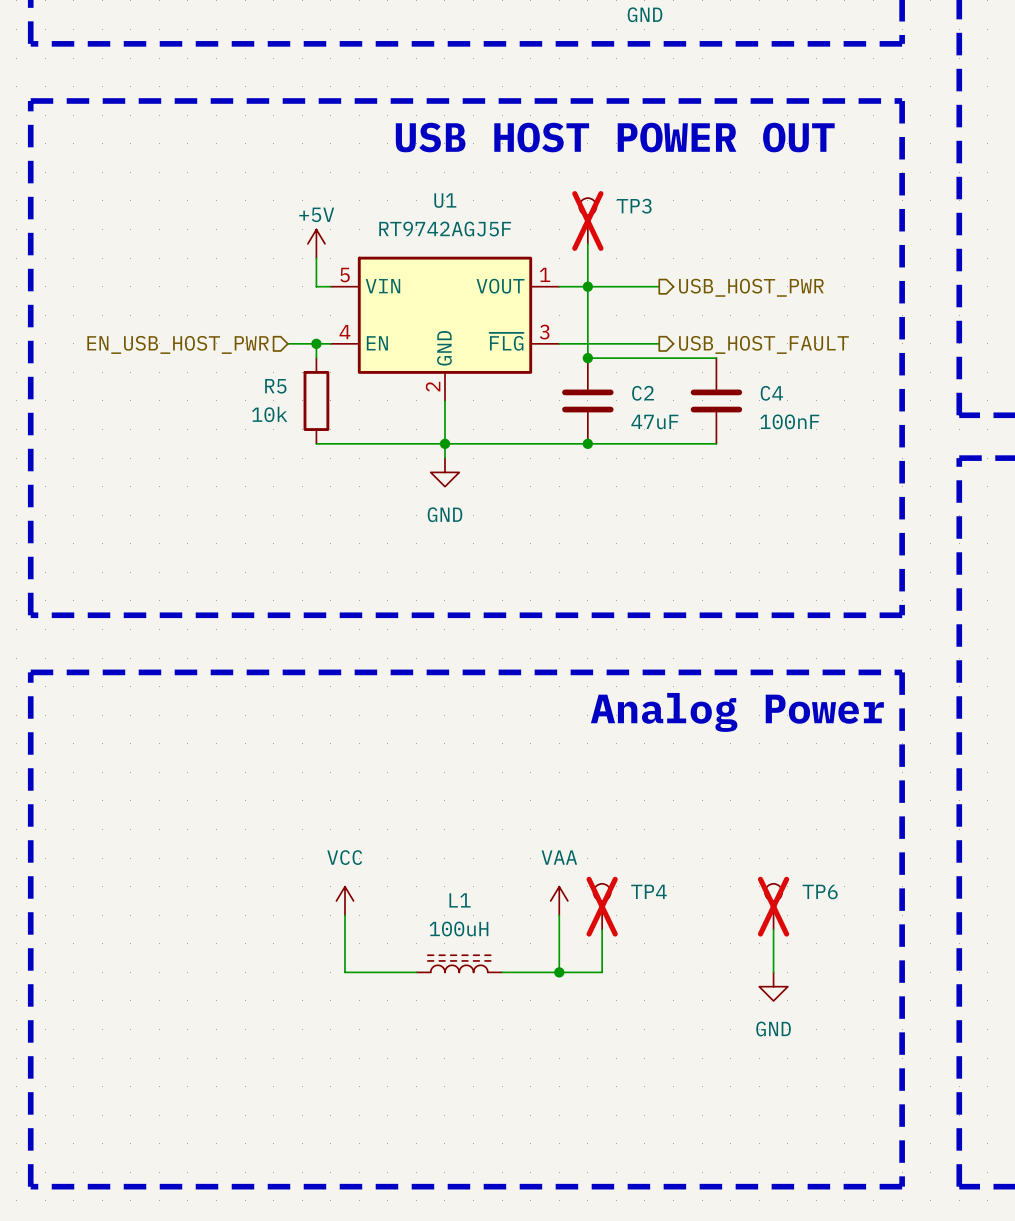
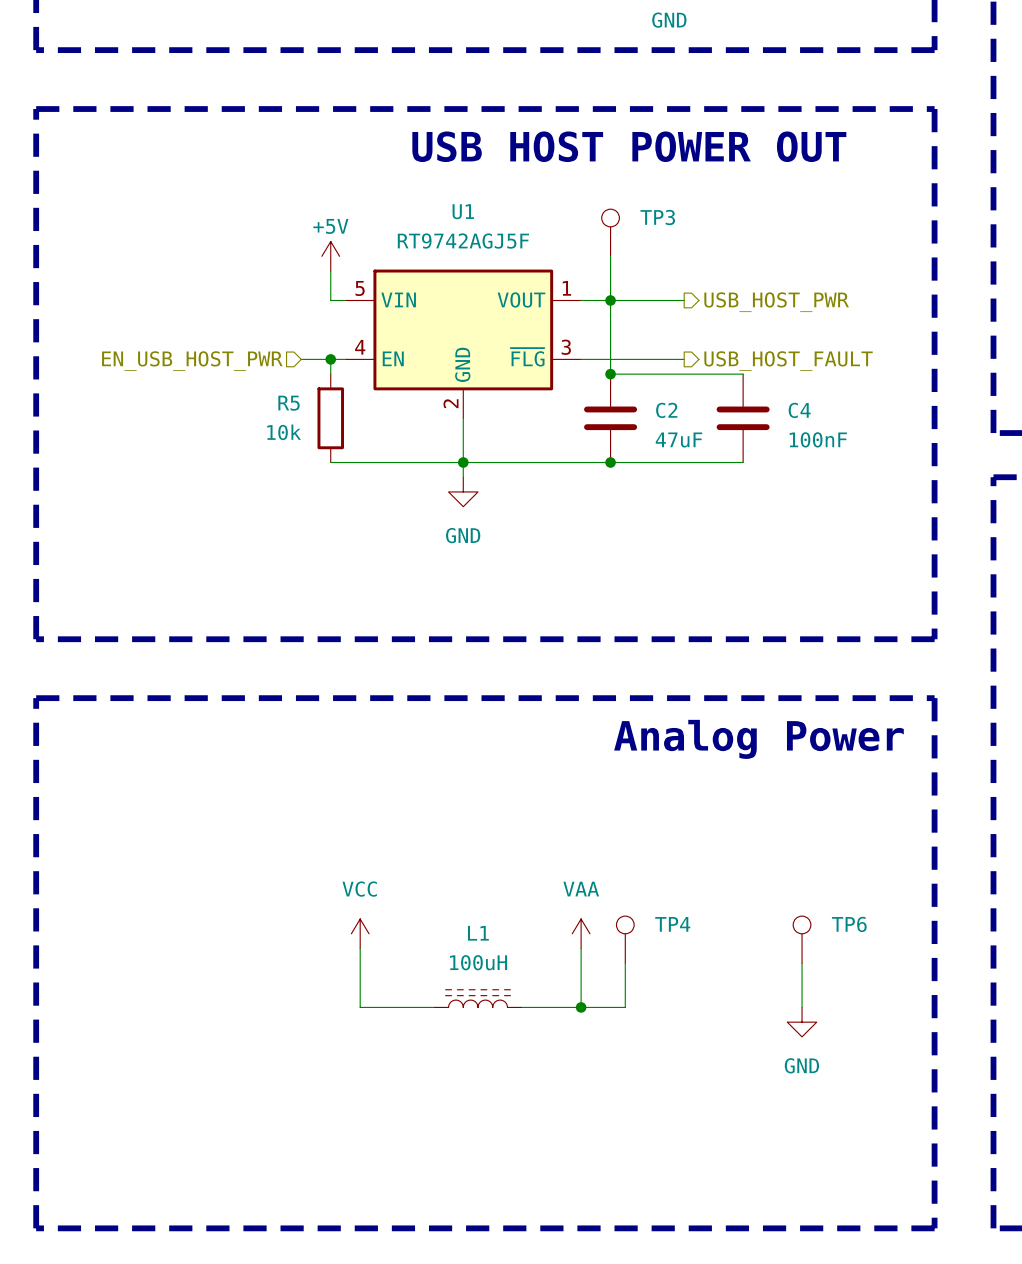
TP3 do-not-place cross: (587, 220) -> none
TP4 do-not-place cross: (602, 906) -> none
TP6 do-not-place cross: (773, 906) -> none

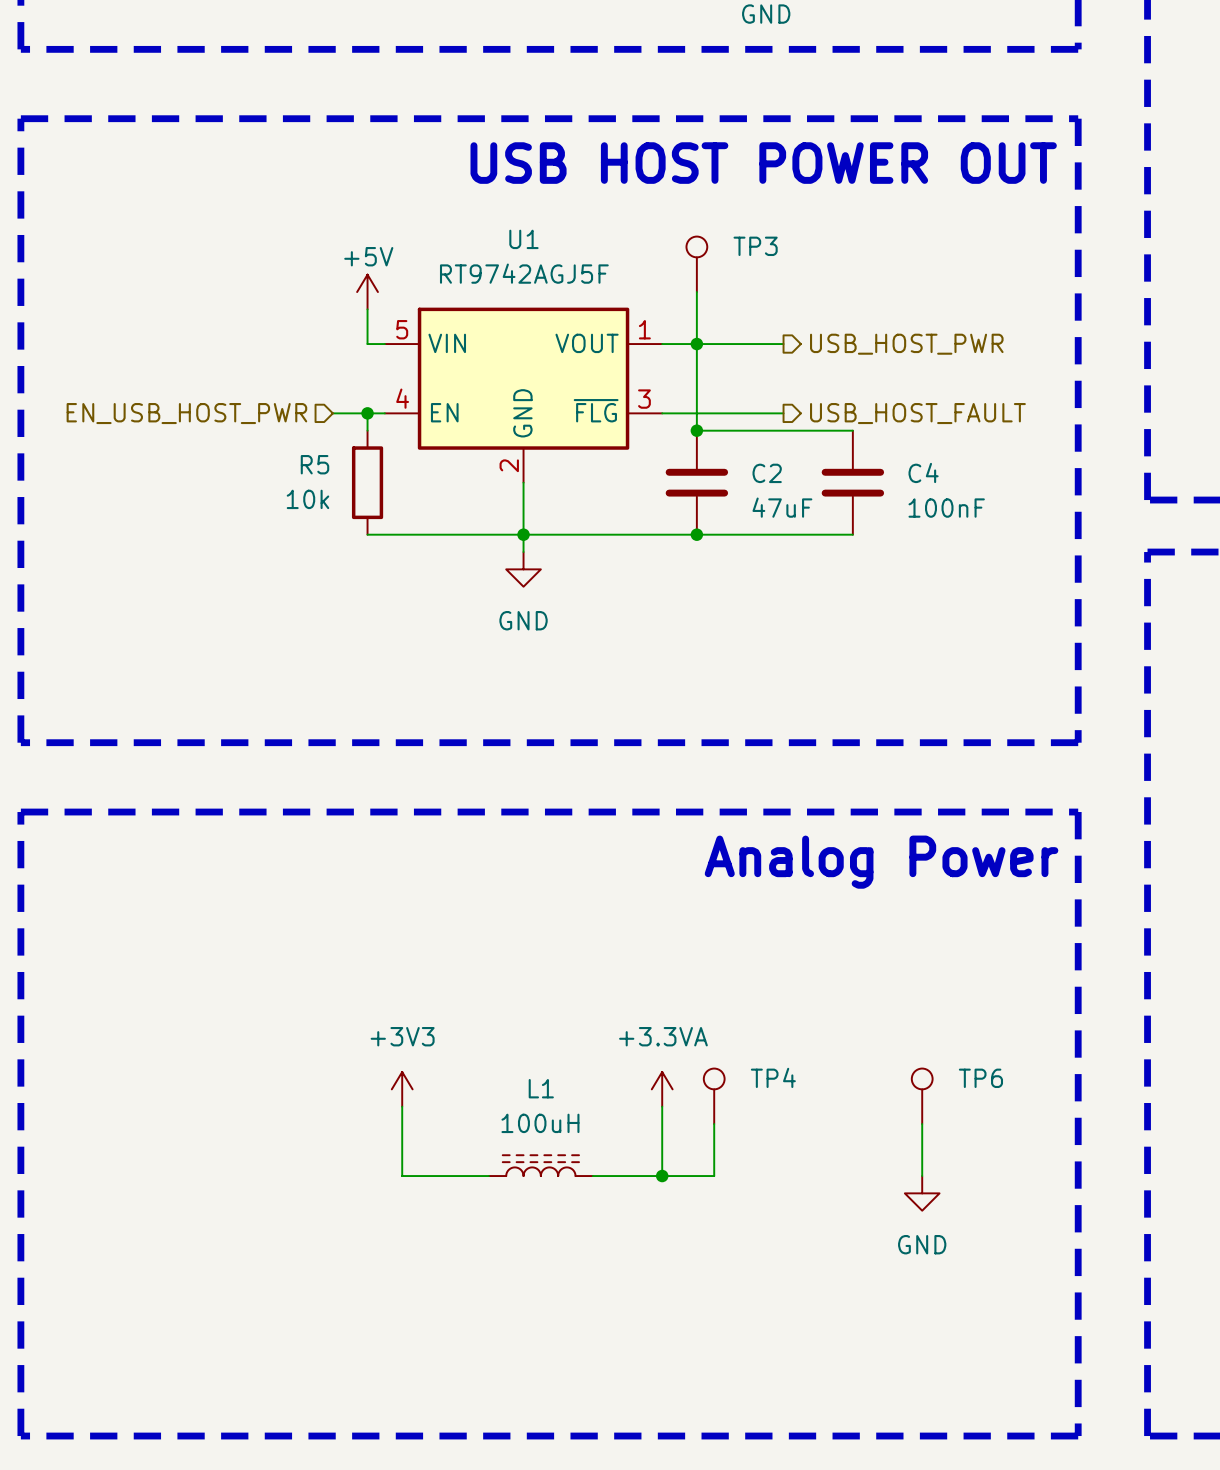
power symbol: VCC (360, 933) -> +3V3 (402, 1089)
power symbol: VAA (581, 933) -> +3.3VA (662, 1089)

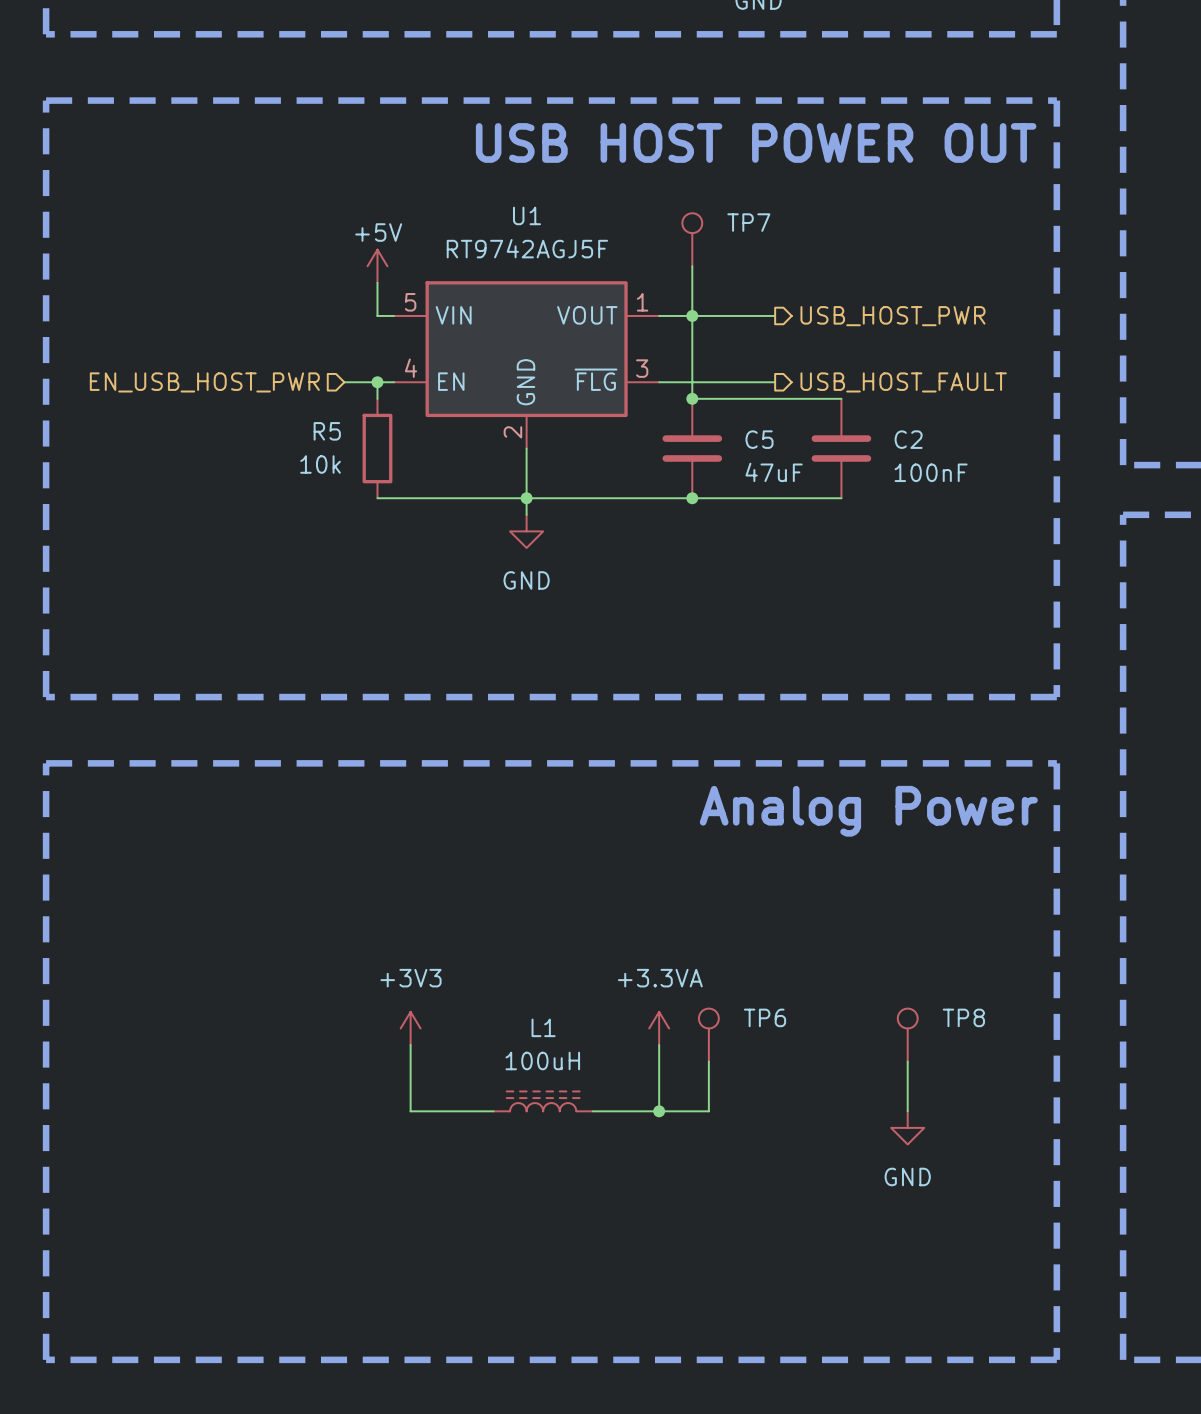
TP3 name: TP3 (755, 246) -> TP7 (748, 222)
C4 name: C4 (923, 472) -> C2 (908, 439)
C2 name: C2 (767, 473) -> C5 (759, 439)
TP4 name: TP4 (773, 1077) -> TP6 (765, 1017)
TP6 name: TP6 (980, 1078) -> TP8 (963, 1017)

